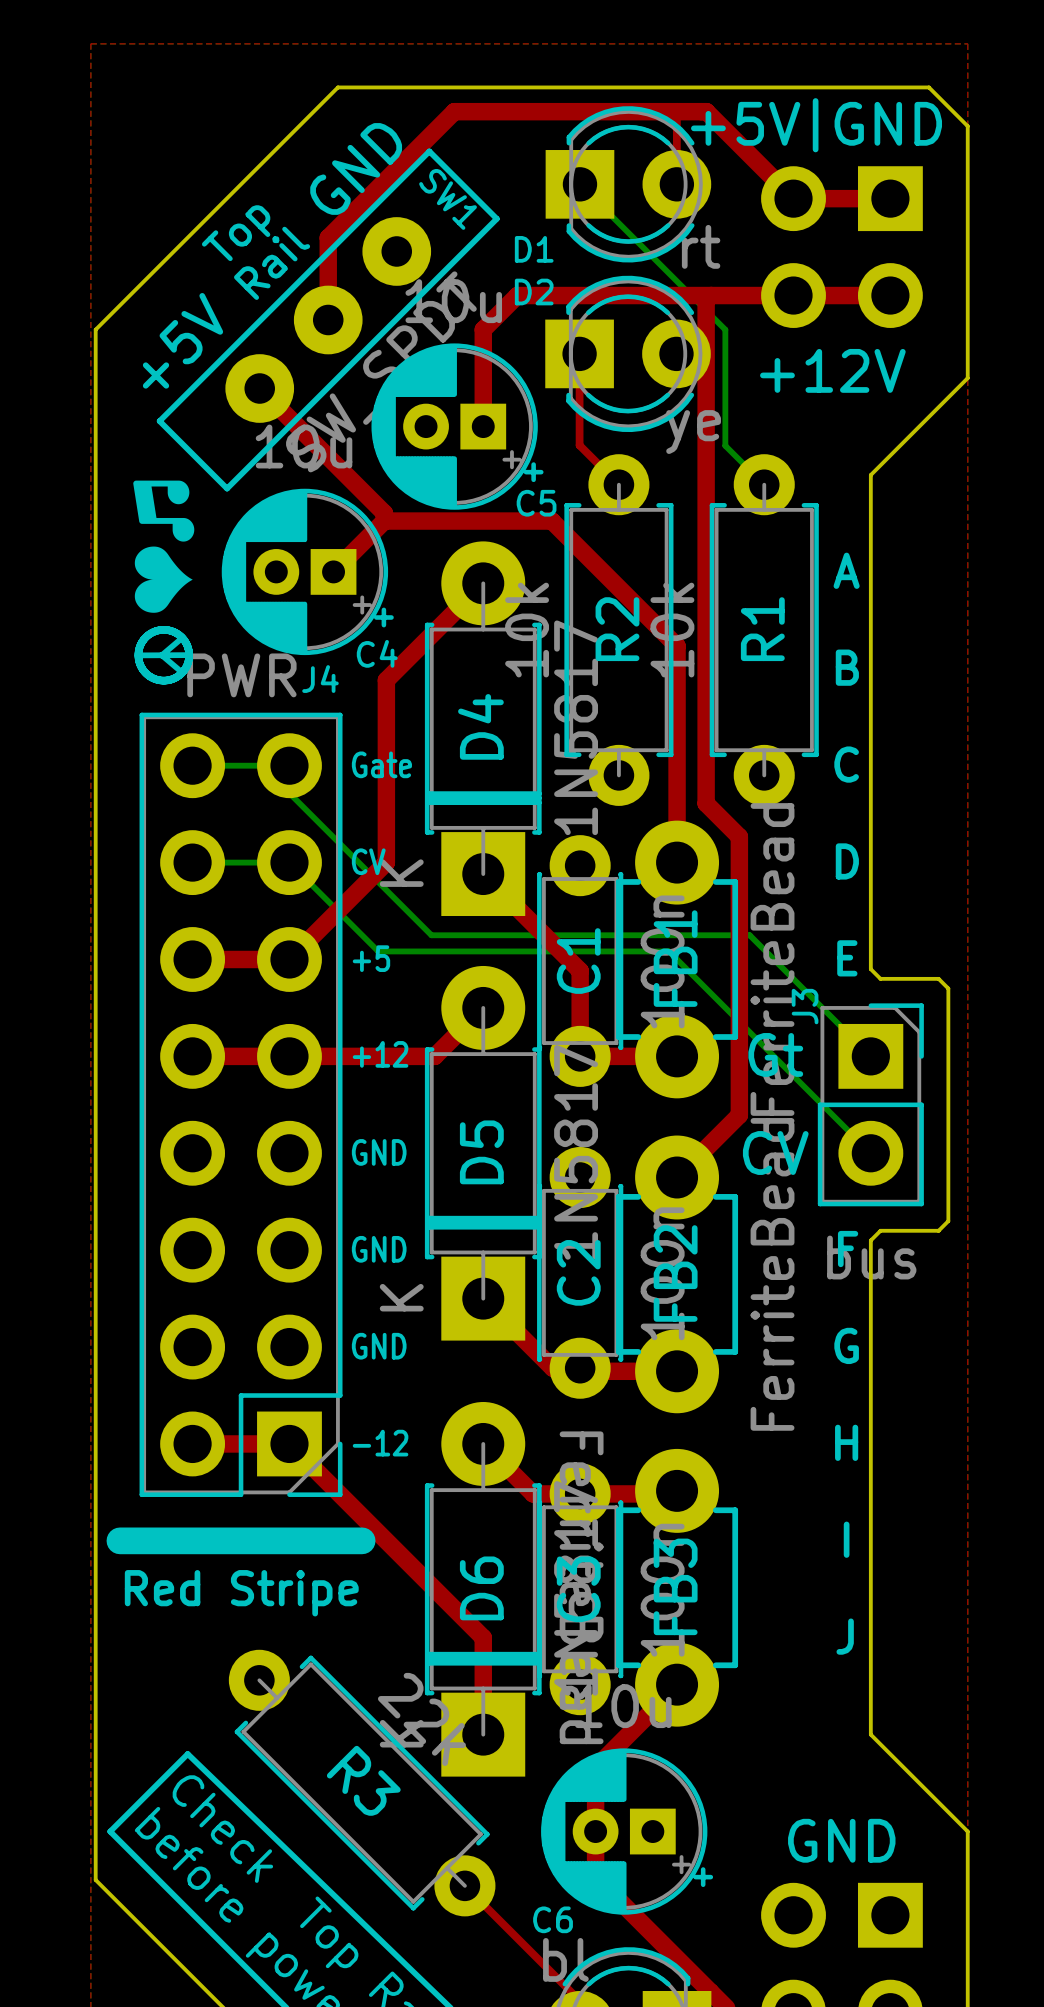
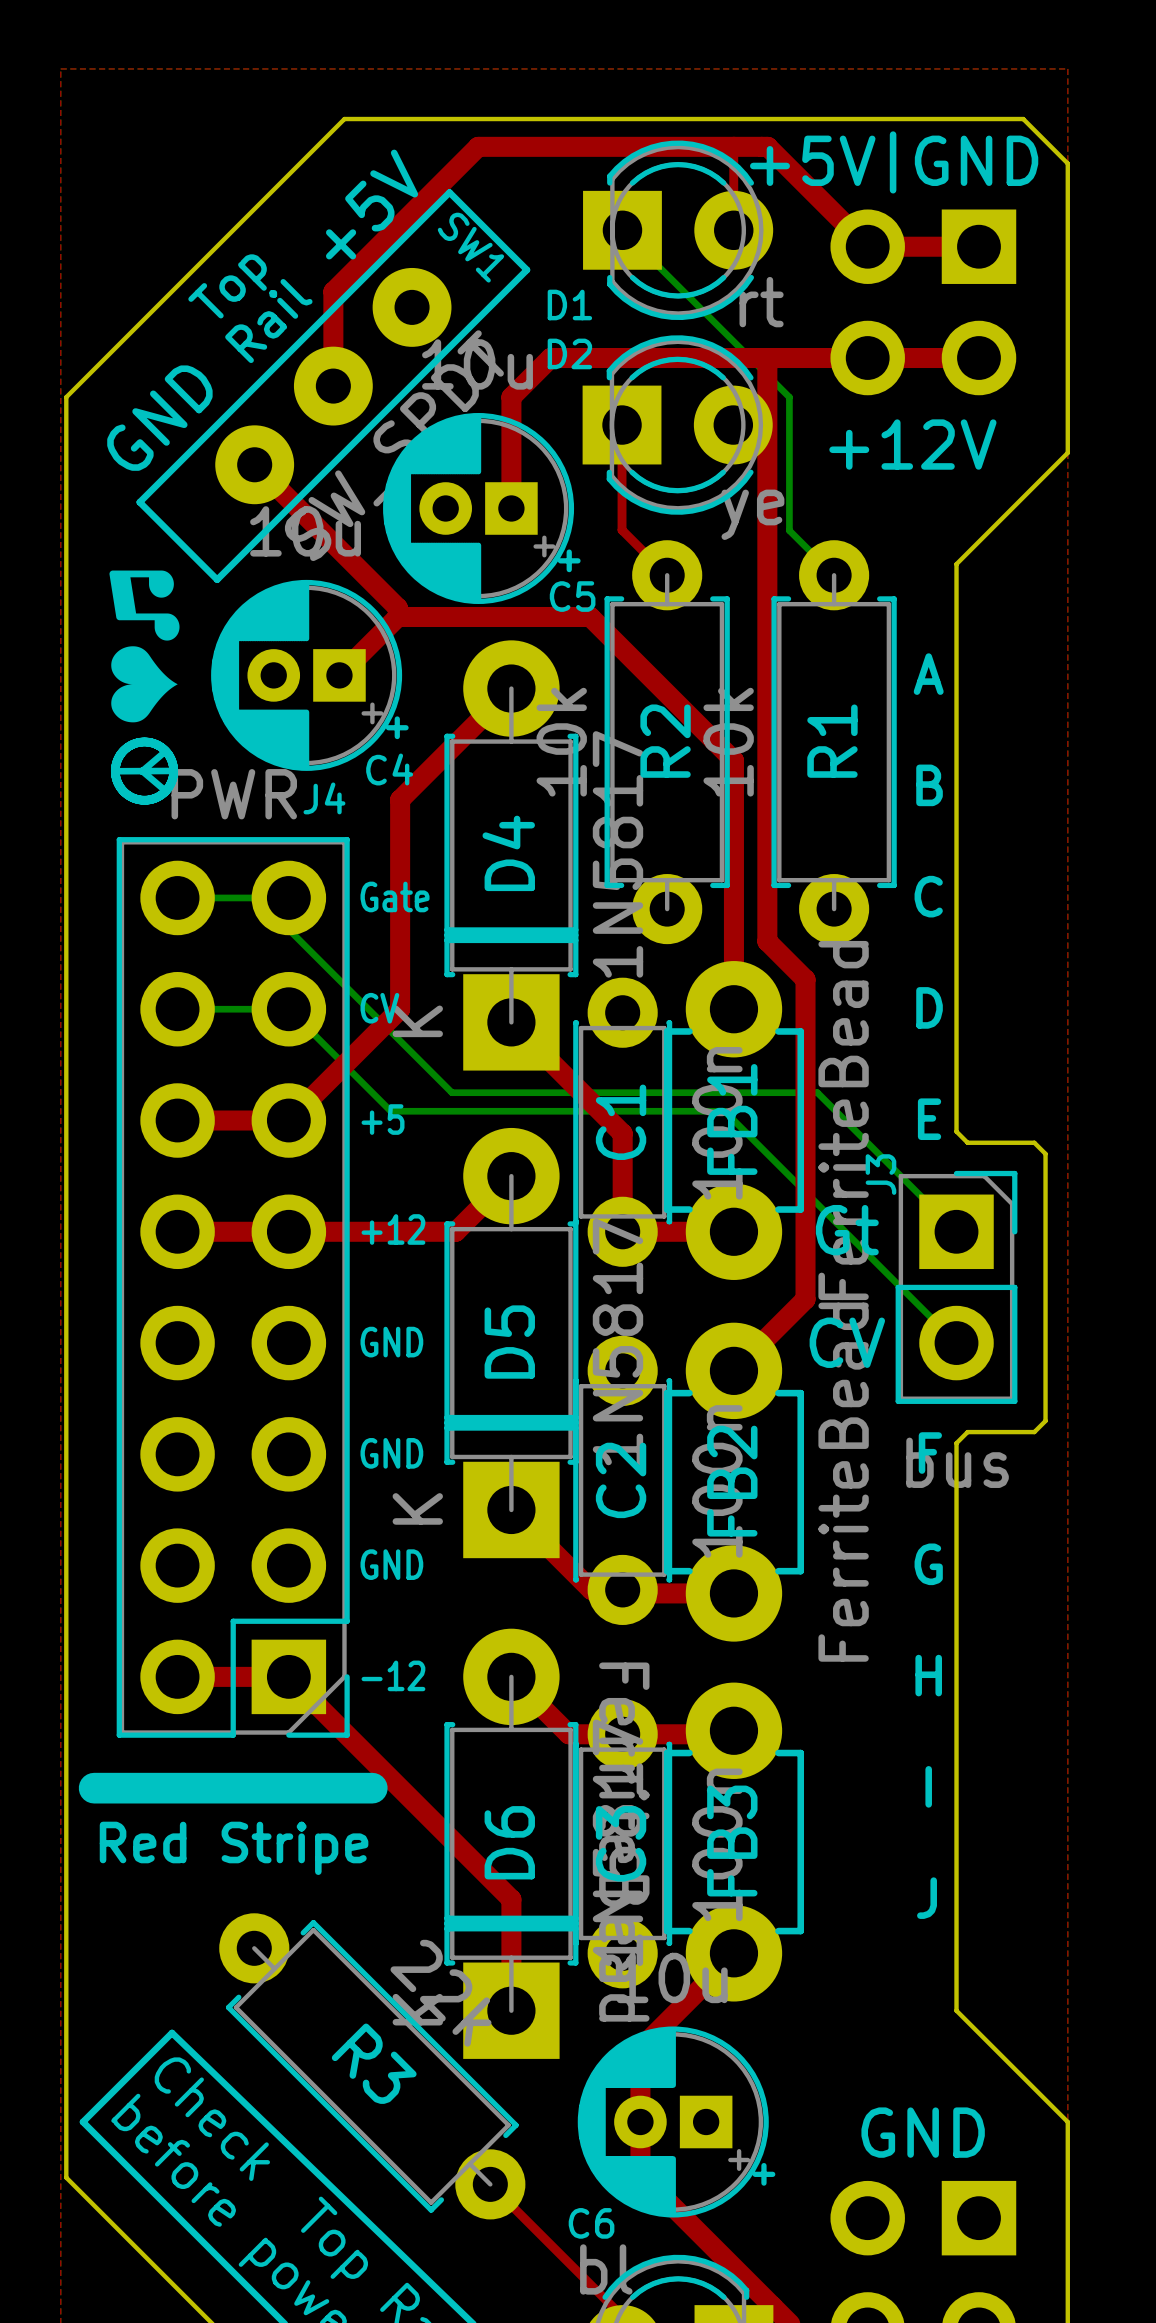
text: GND (356, 168) -> +5V (372, 204)
text: +5V (182, 340) -> GND (159, 418)

